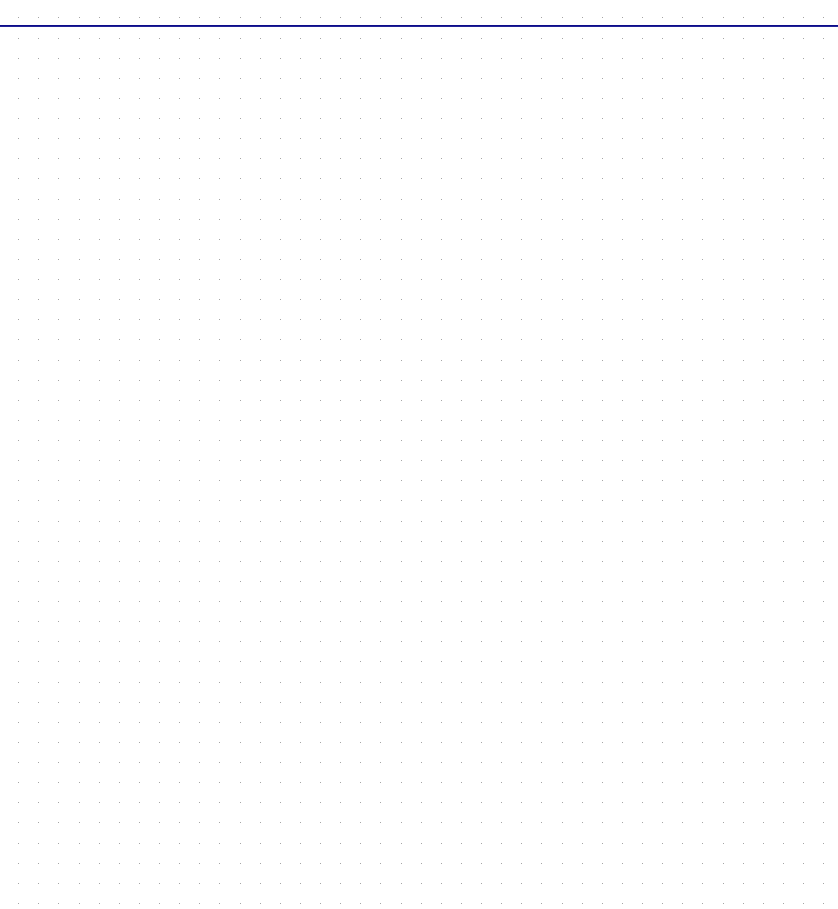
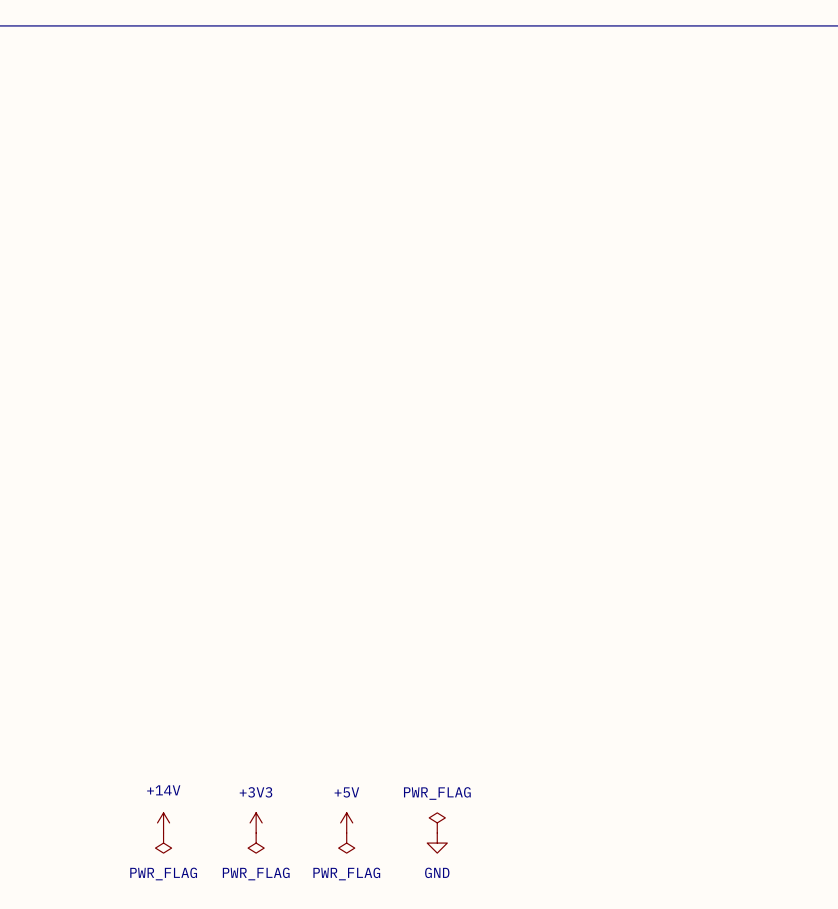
power symbol: none -> +14V (163, 822)
power symbol: none -> +3V3 (256, 822)
power symbol: none -> +5V (346, 822)
power symbol: none -> PWR_FLAG (437, 822)
power symbol: none -> PWR_FLAG (163, 843)
power symbol: none -> PWR_FLAG (256, 843)
power symbol: none -> PWR_FLAG (346, 843)
power symbol: none -> GND (437, 843)

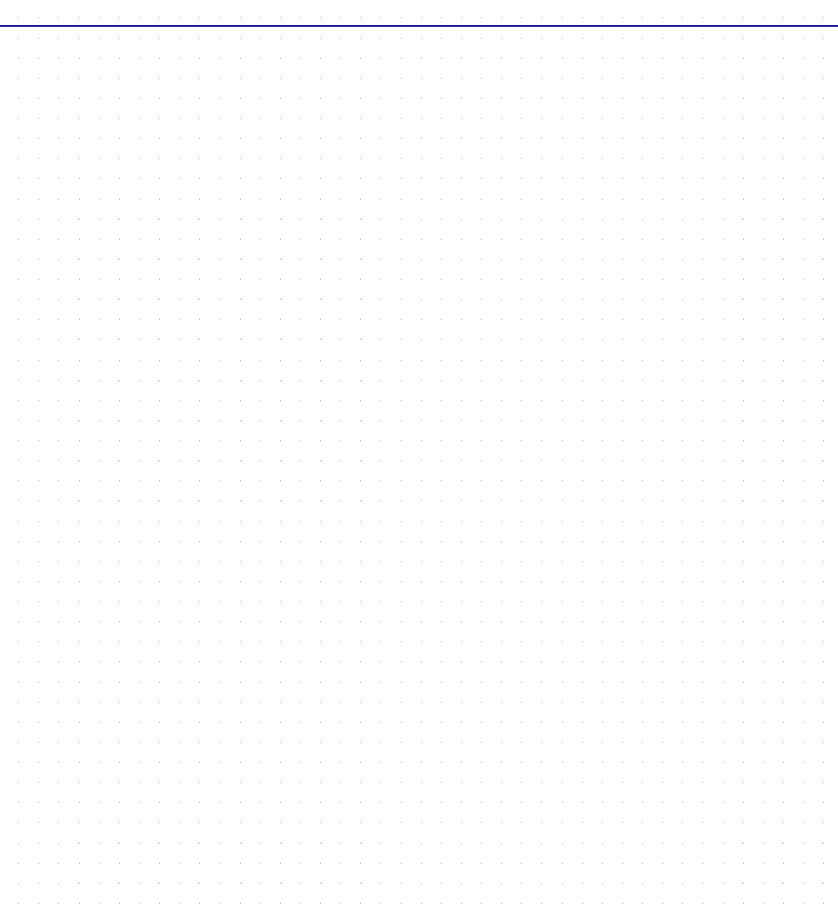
power symbol: +14V (163, 822) -> none
power symbol: +3V3 (256, 822) -> none
power symbol: +5V (346, 822) -> none
power symbol: PWR_FLAG (437, 822) -> none
power symbol: PWR_FLAG (163, 843) -> none
power symbol: PWR_FLAG (256, 843) -> none
power symbol: PWR_FLAG (346, 843) -> none
power symbol: GND (437, 843) -> none

